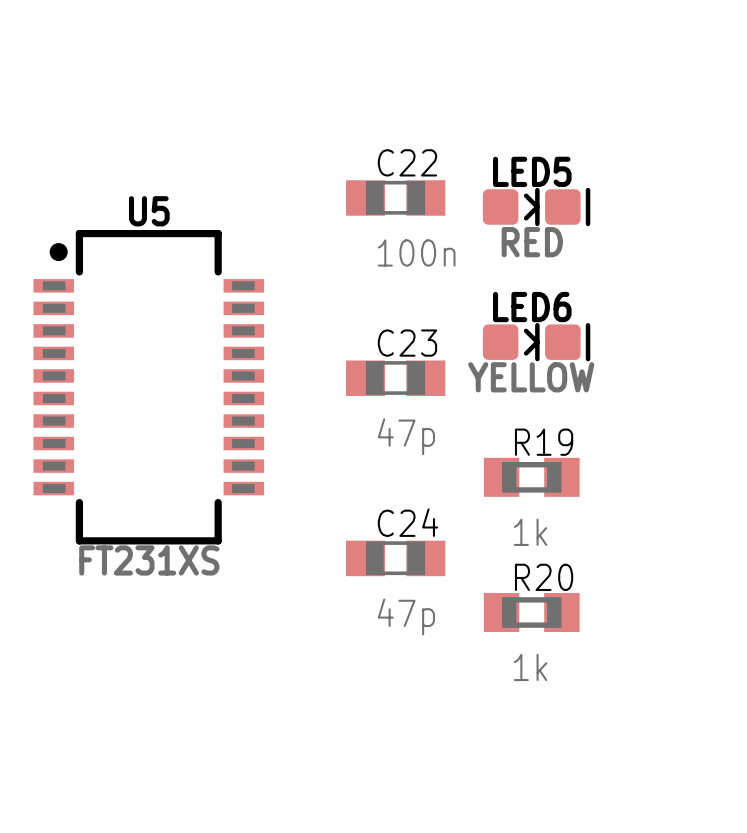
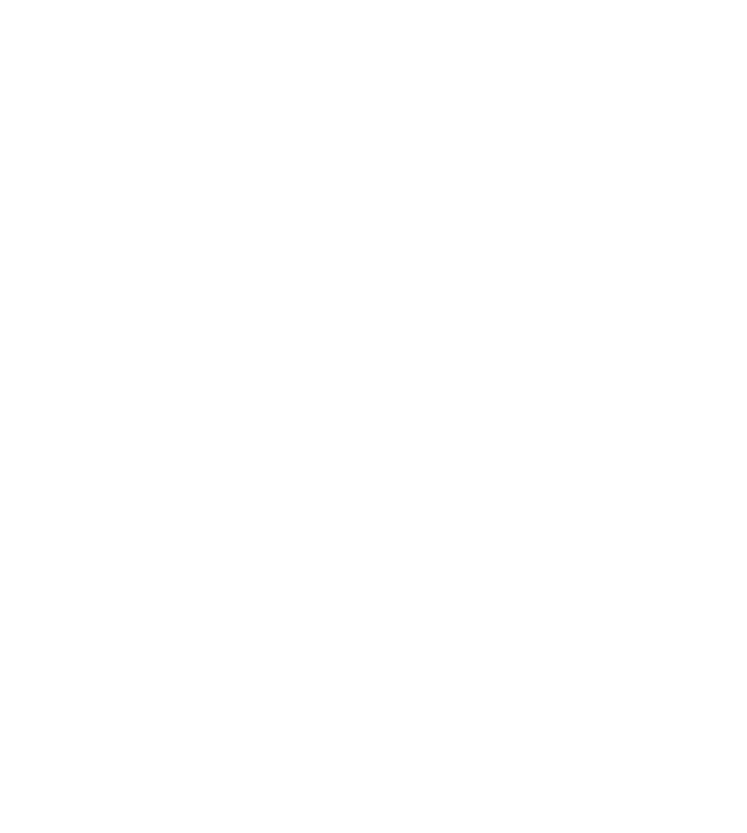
C22: 100n (395, 198) -> none
LED5: RED (536, 207) -> none
LED6: YELLOW (536, 342) -> none
C23: 47p (395, 378) -> none
U5: FT231XS (148, 387) -> none
R19: 1k (531, 477) -> none
C24: 47p (395, 558) -> none
R20: 1k (531, 612) -> none

